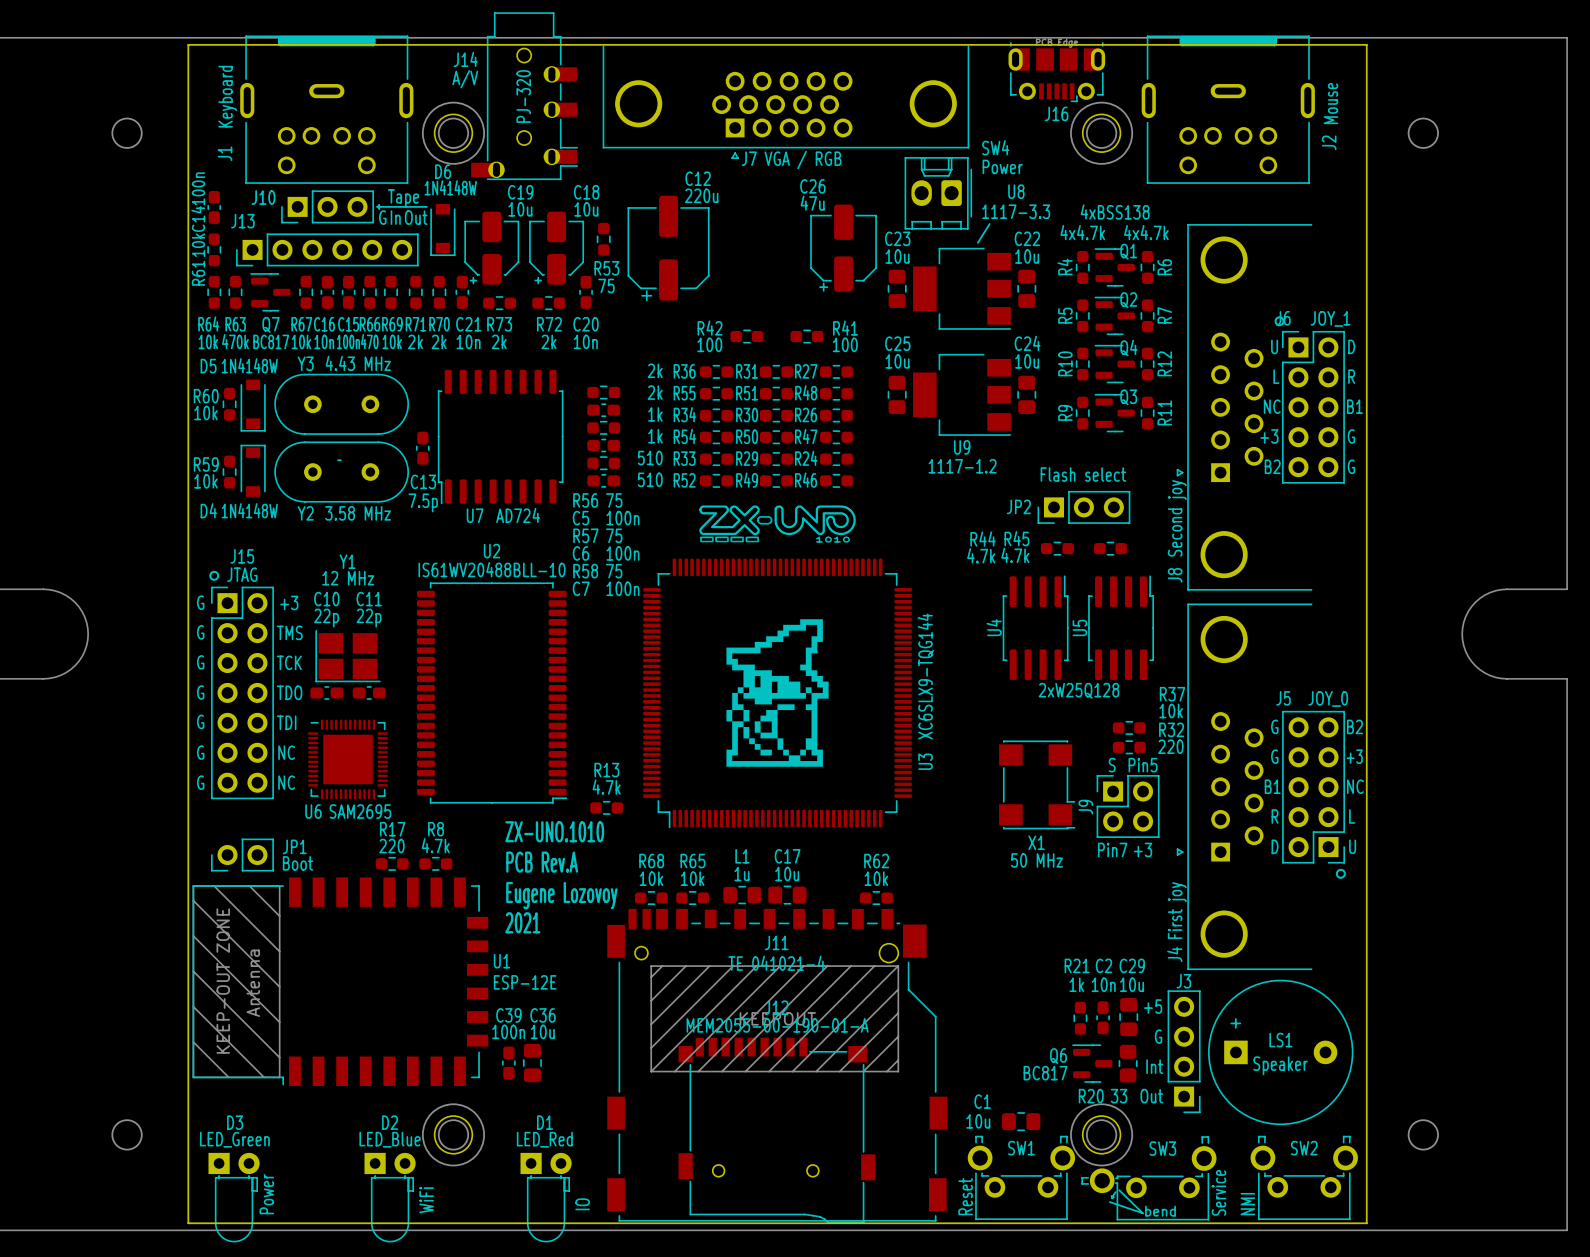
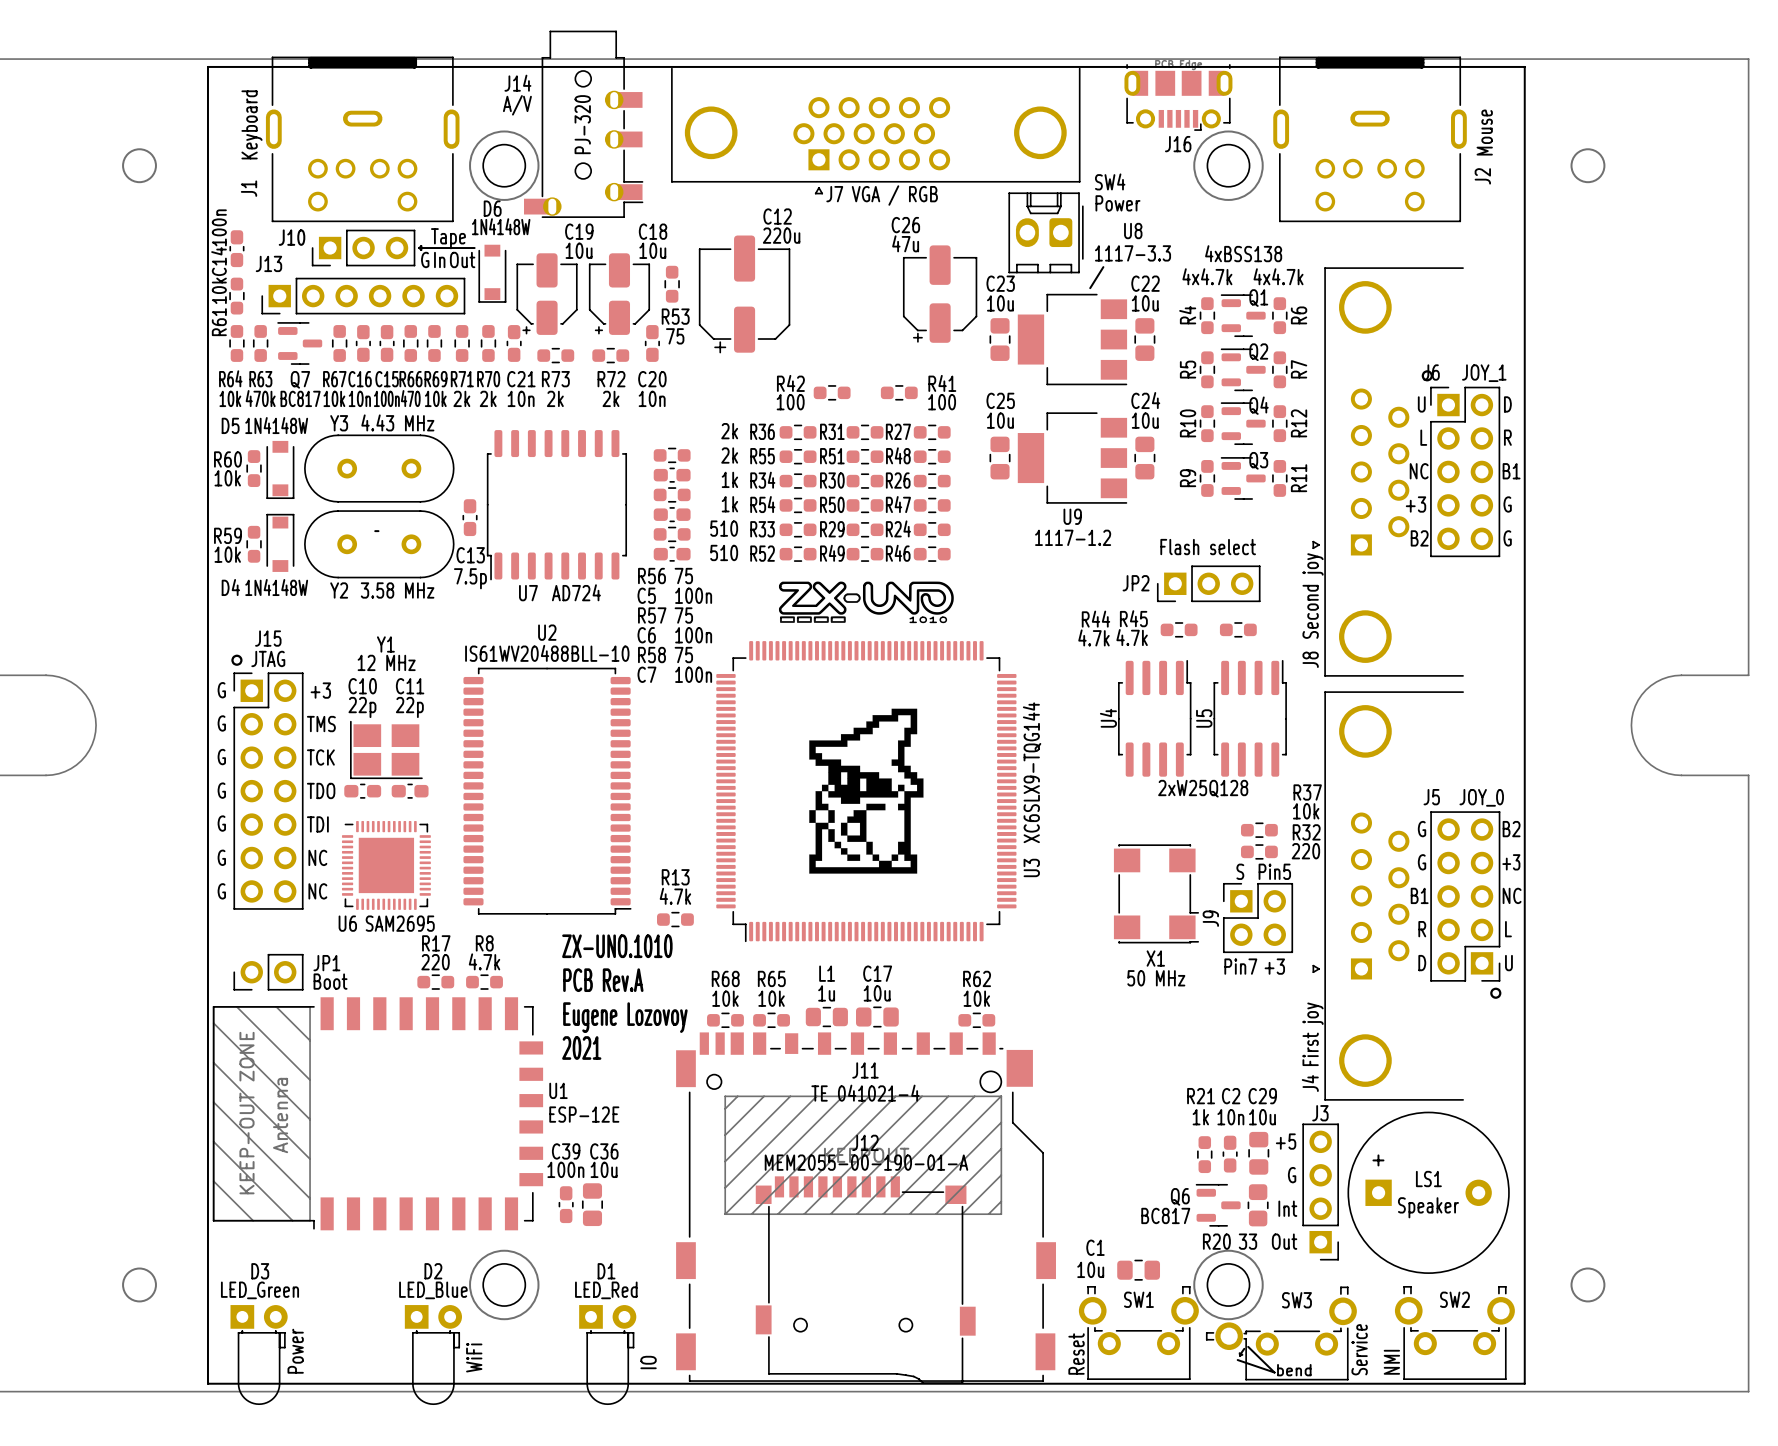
drawing: [437, 117, 470, 149] -> none
drawing: [1085, 117, 1118, 149] -> none
drawing: [437, 1119, 470, 1151] -> none
drawing: [1085, 1119, 1118, 1151] -> none

